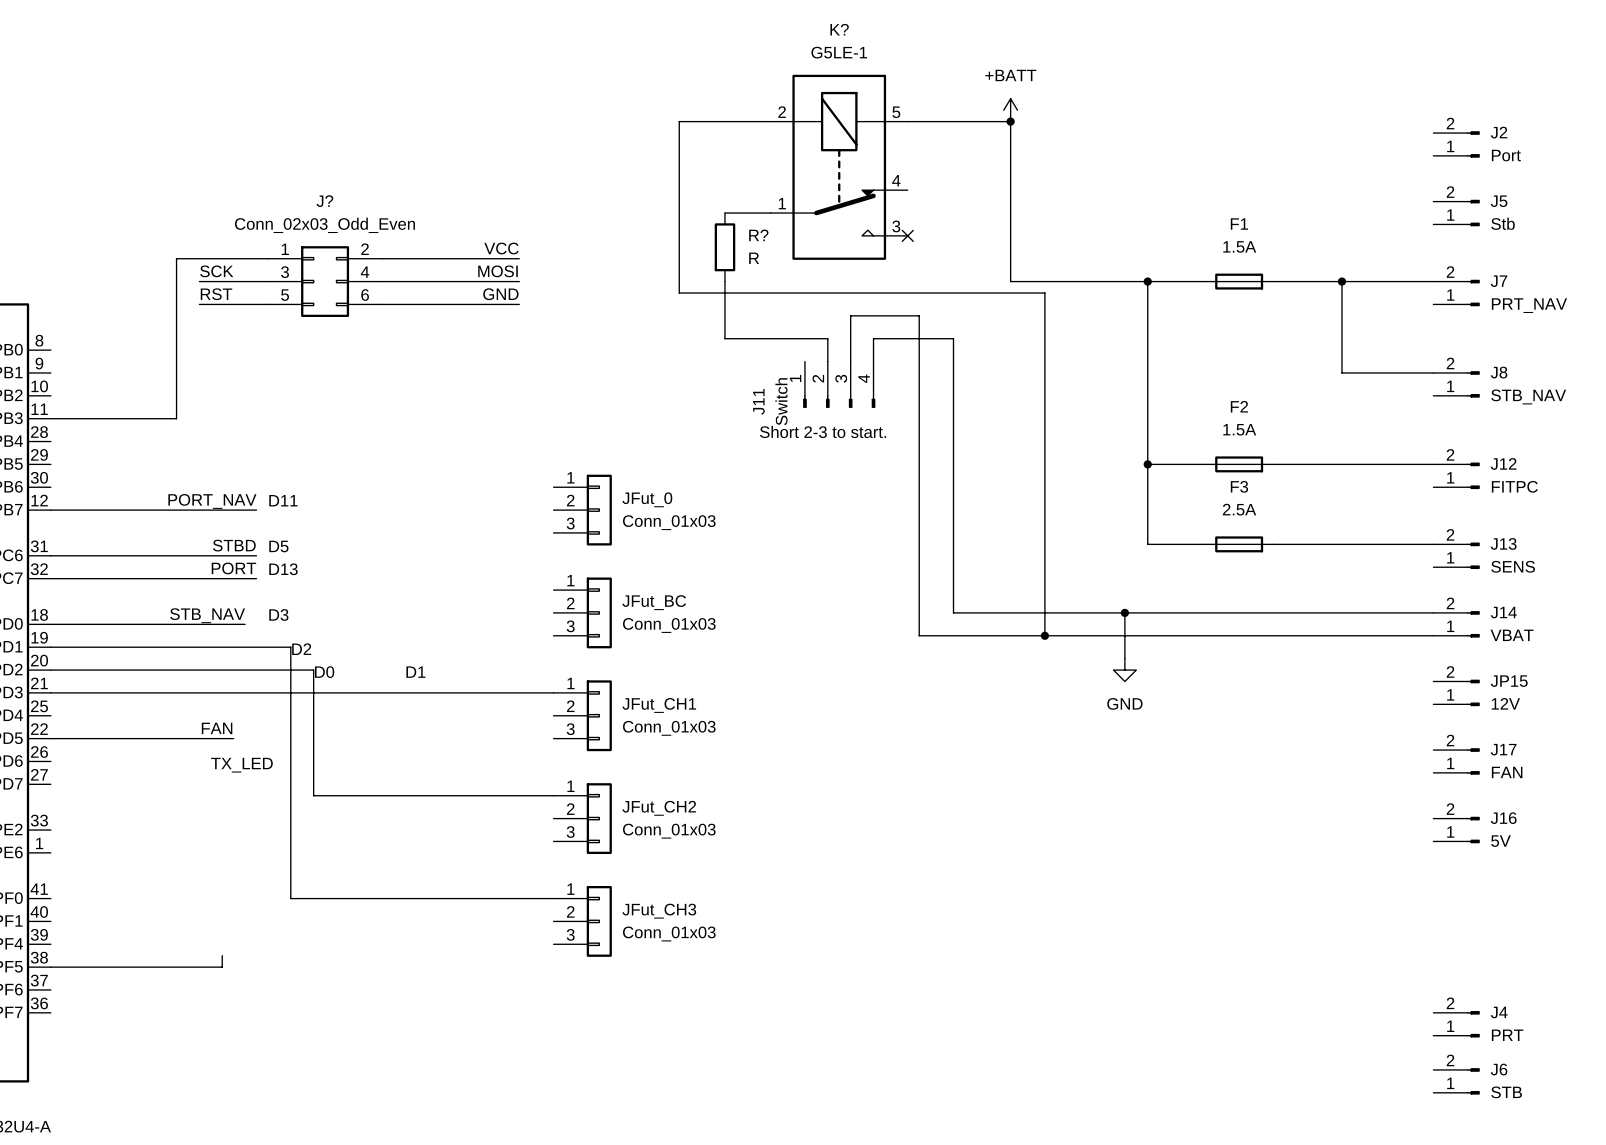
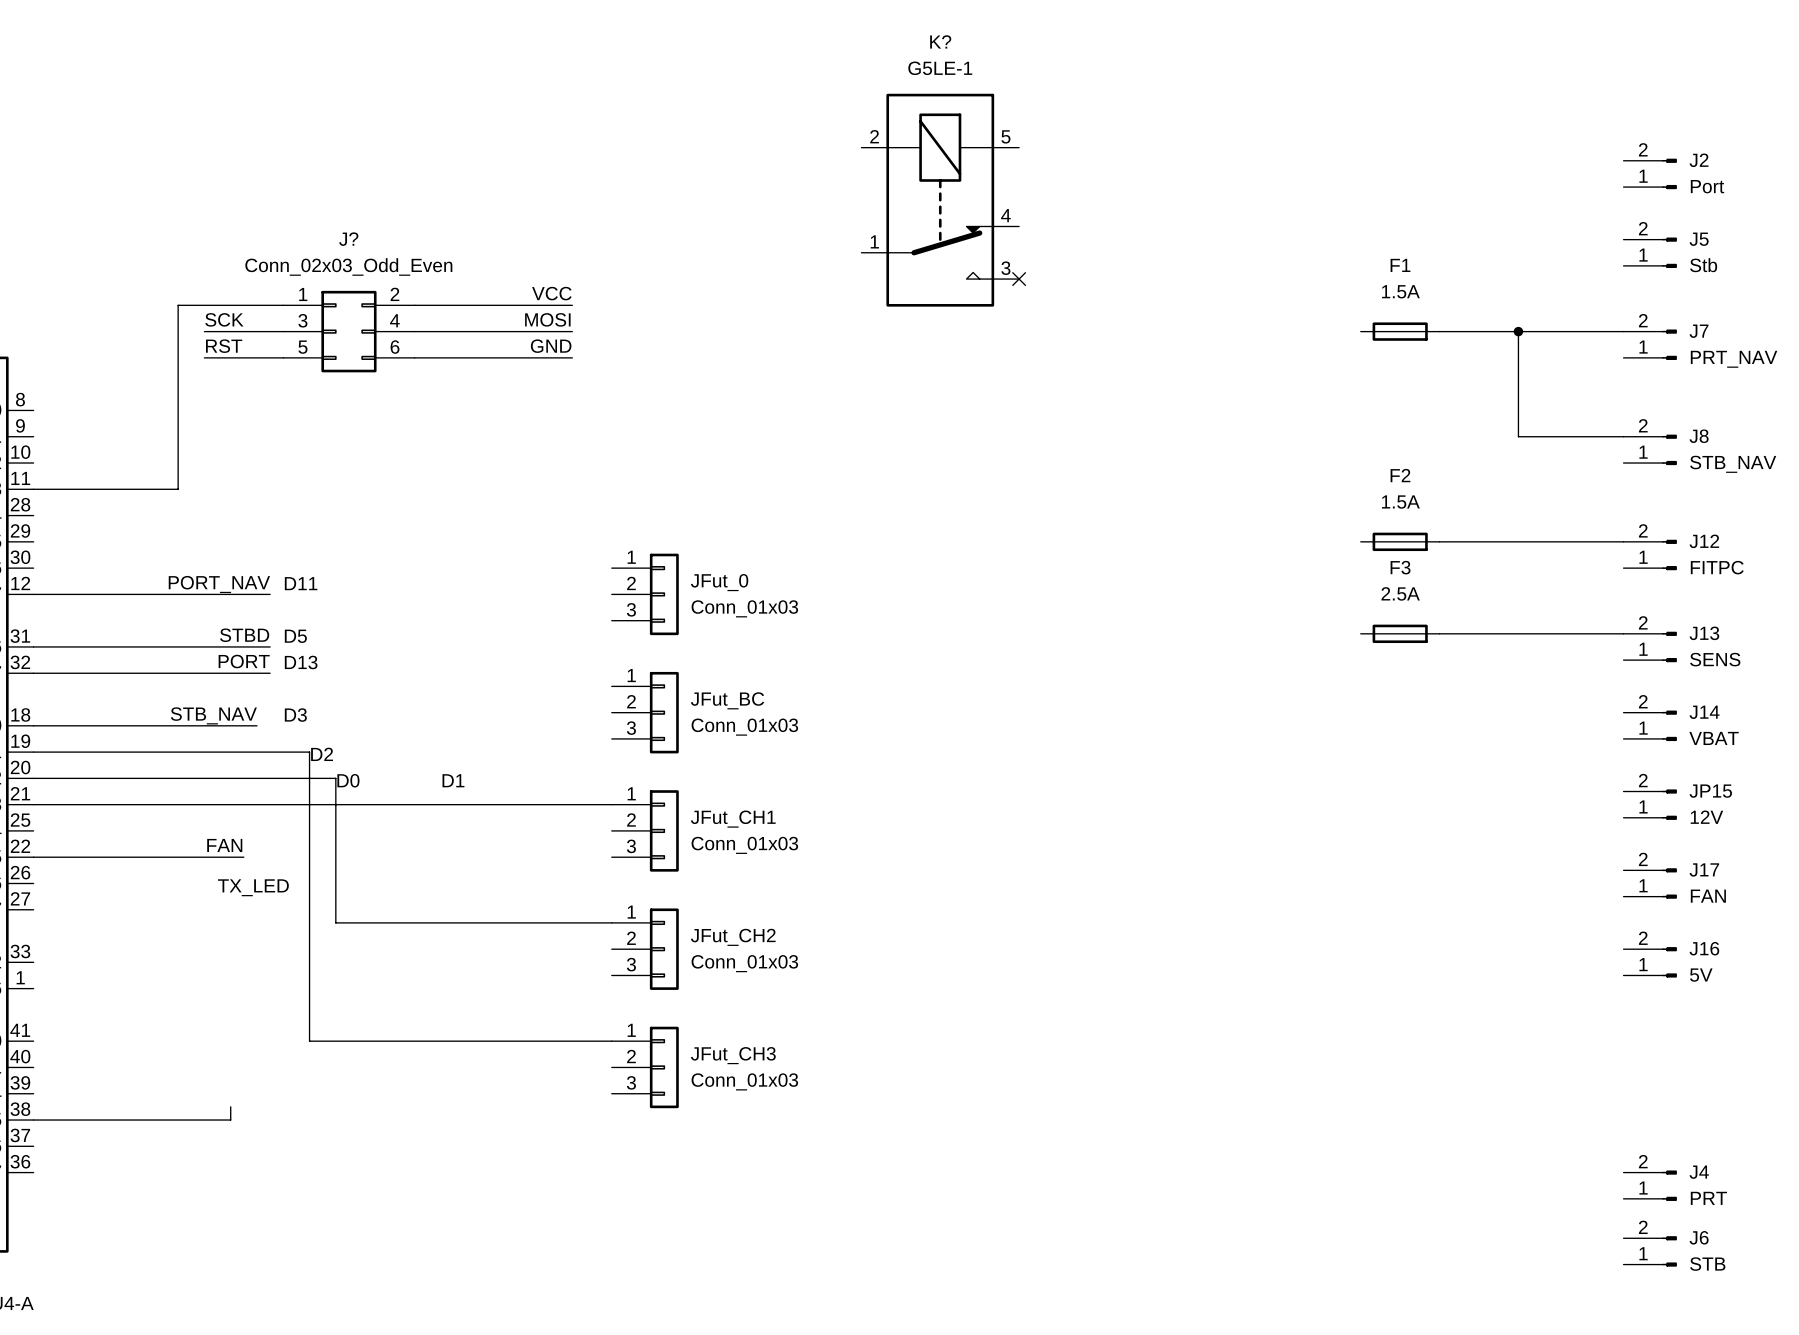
power symbol: +BATT (1010, 110) -> none
wire: (770, 121) (679, 121) (679, 293) (1044, 293) (1044, 635) -> none
wire: (907, 121) (1010, 121) (1010, 281) (1204, 281) -> none
junction: (1010, 121) -> none
wire: (724, 213) (770, 213) -> none
R?: R (724, 247) -> none
wire: (724, 281) (724, 338) (827, 338) (827, 361) -> none
wire: (1147, 281) (1147, 544) (1204, 544) -> none
junction: (1147, 281) -> none
wire: (850, 361) (850, 315) (919, 315) (919, 635) (1433, 635) -> none
wire: (873, 361) (873, 338) (953, 338) (953, 612) (1433, 612) -> none
J11: Switch (839, 384) -> none
text: Short 2-3 to start. (823, 431) -> none
wire: (1147, 464) (1204, 464) -> none
junction: (1147, 464) -> none
wire: (1124, 612) (1124, 658) -> none
junction: (1124, 612) -> none
junction: (1044, 635) -> none
power symbol: GND (1124, 670) -> none

